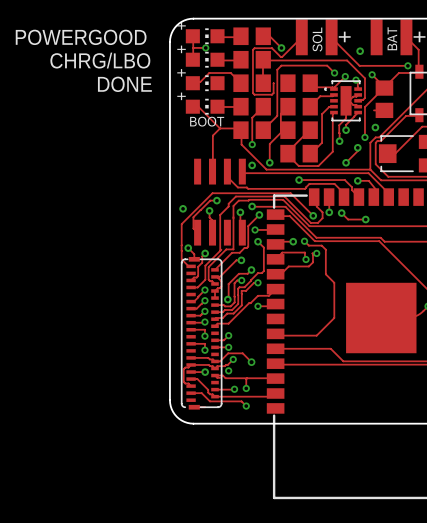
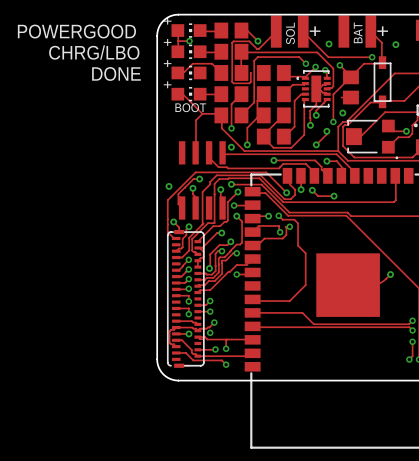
track: (215, 361) (220, 361) (228, 353) (242, 353) (251, 362) -> none
via: (251, 362) -> none

